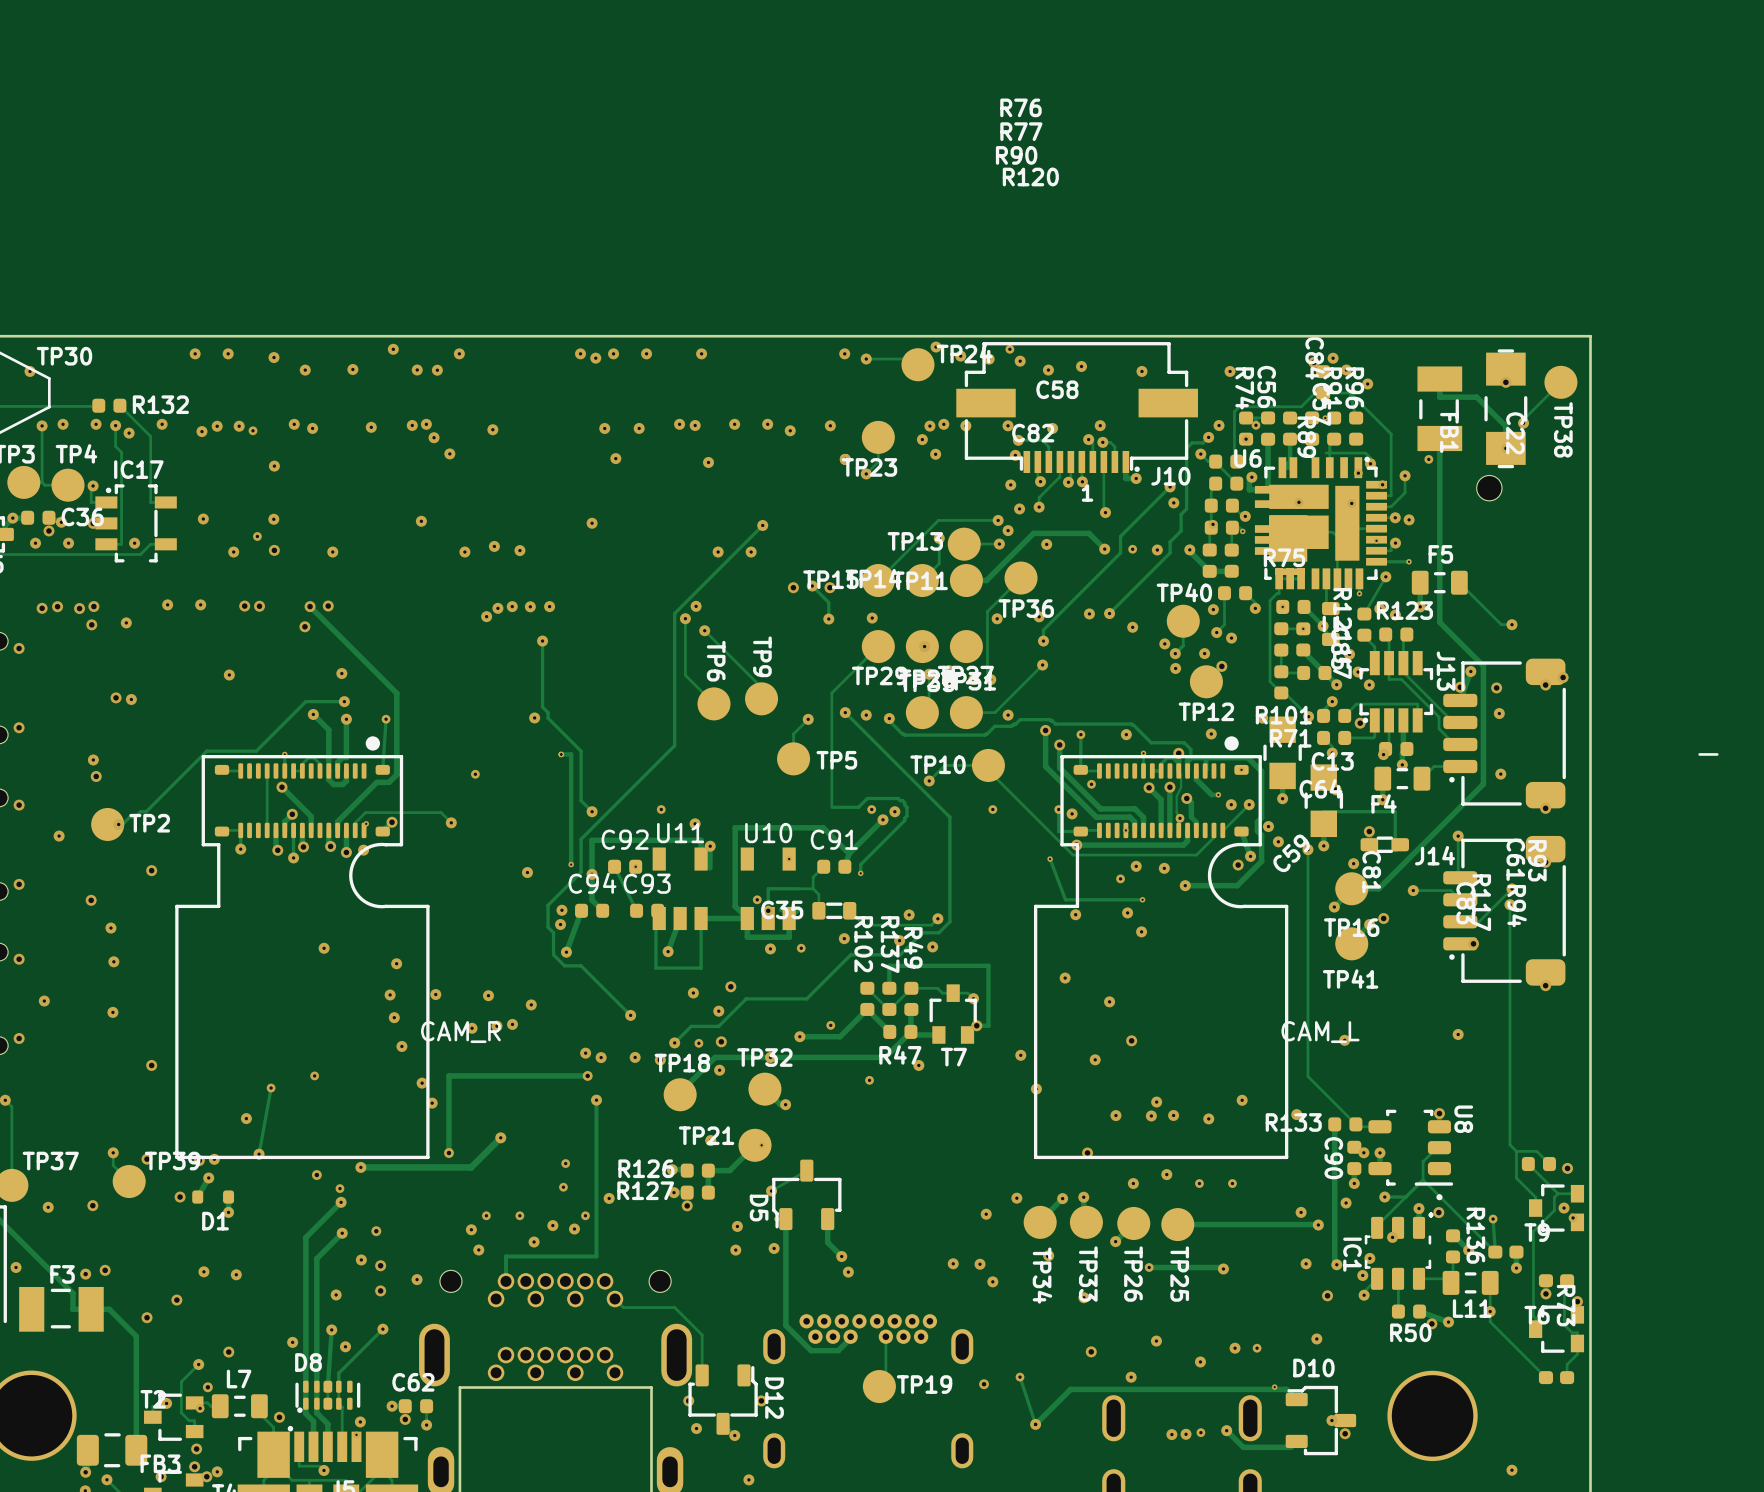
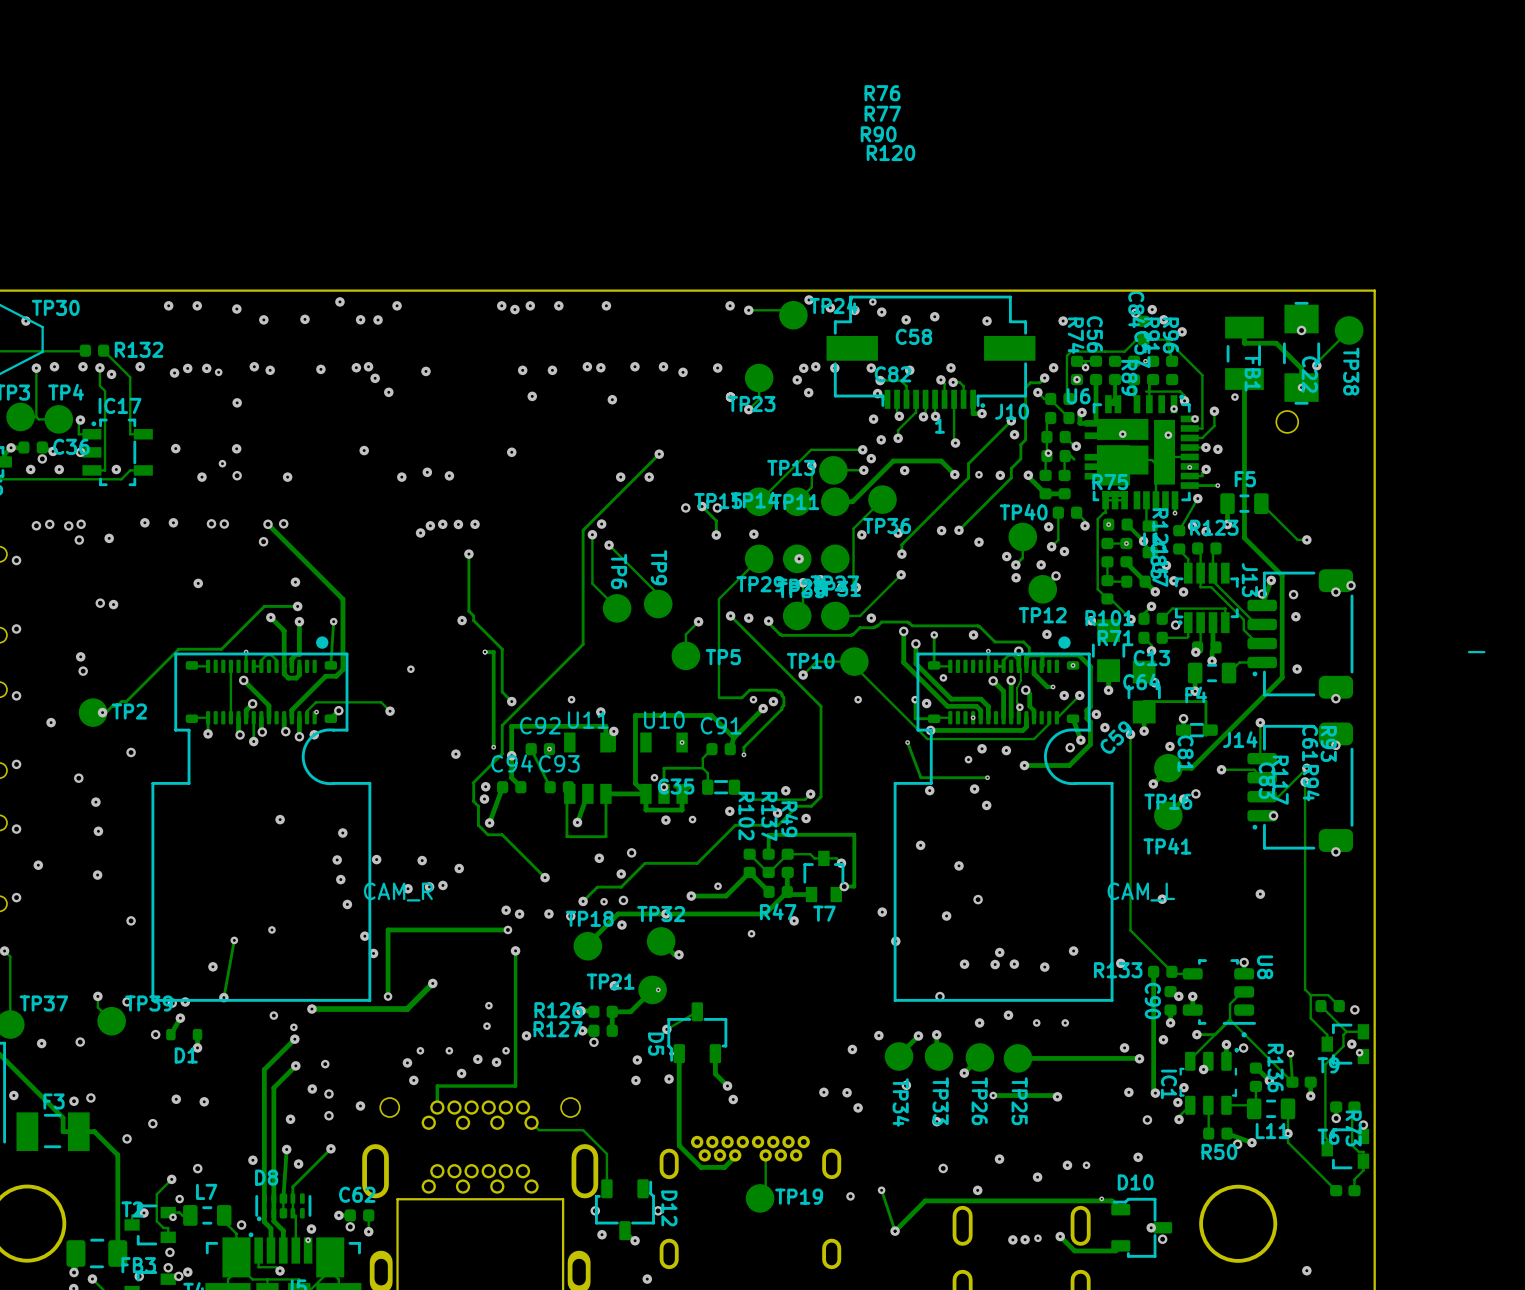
via: (1242, 531) -> none

